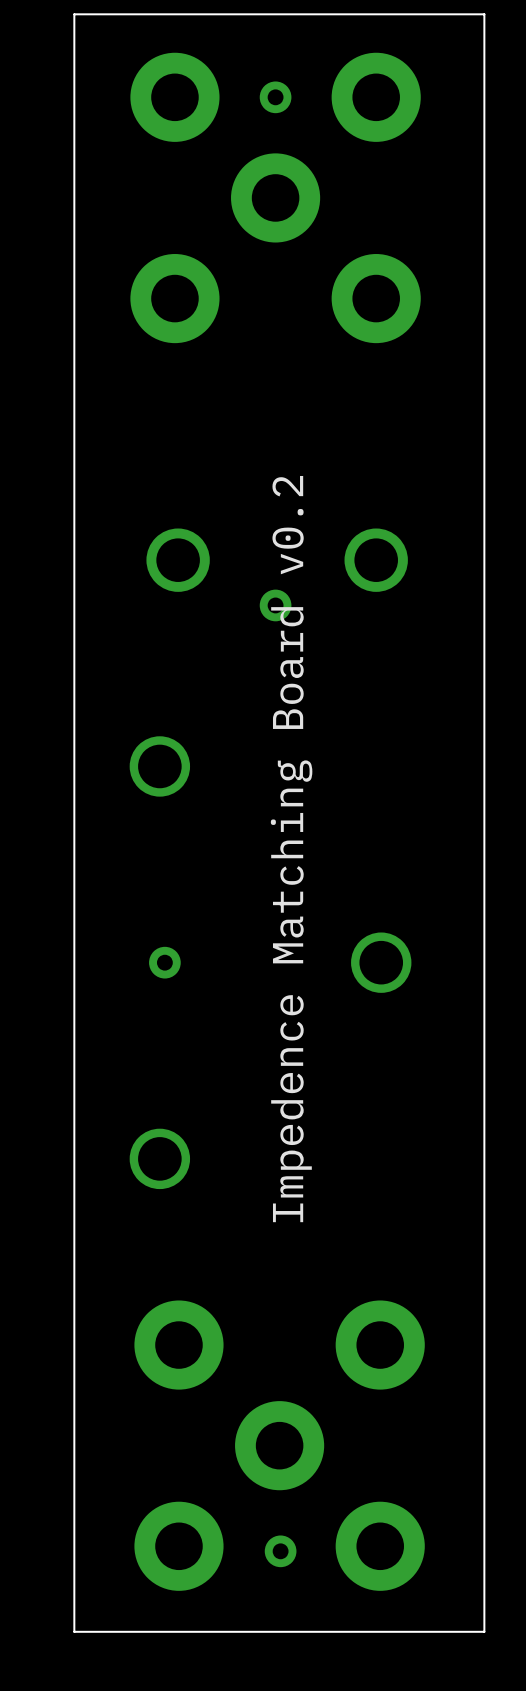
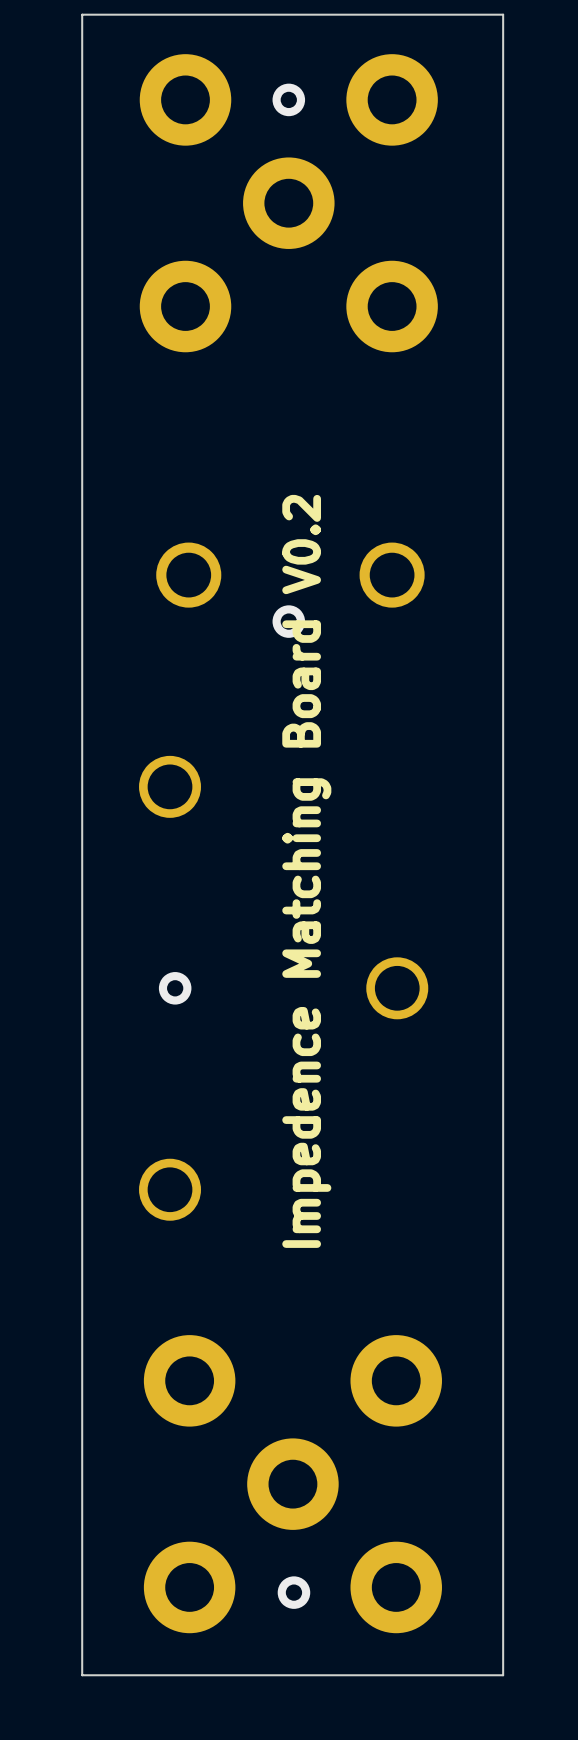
text: Impedence Matching Board v0.2 (291, 849) -> Impedence Matching Board V0.2 (306, 871)

